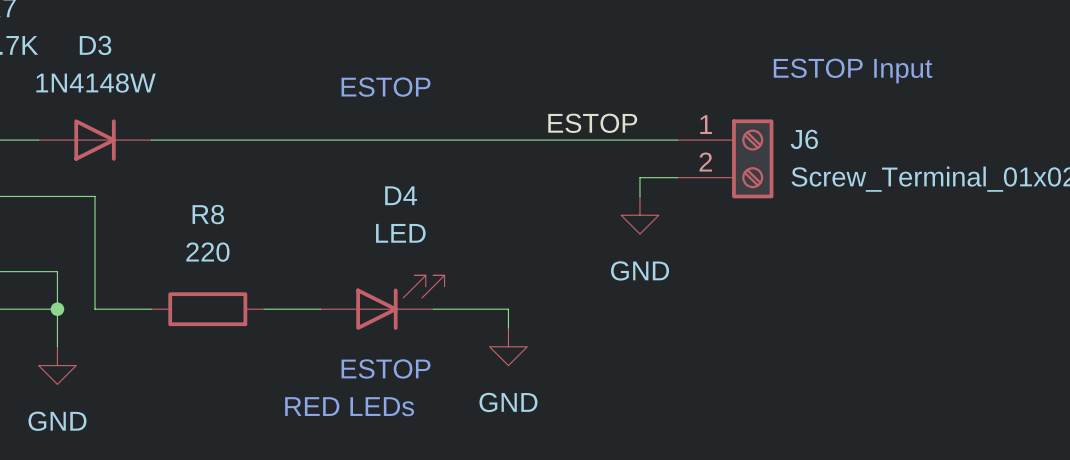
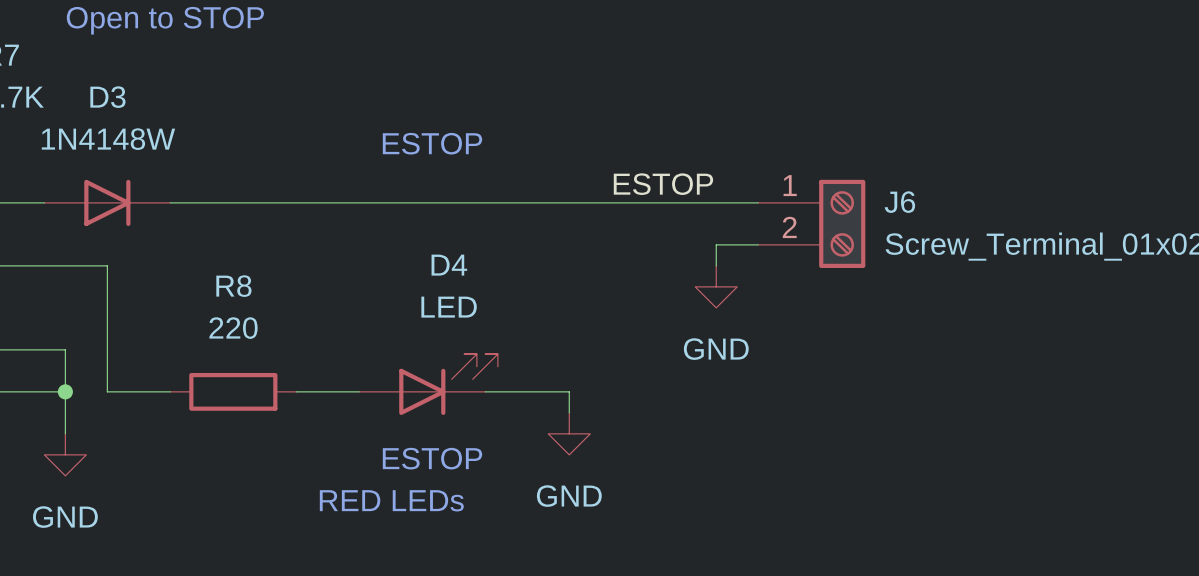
text: ESTOP Input (853, 71) -> none

